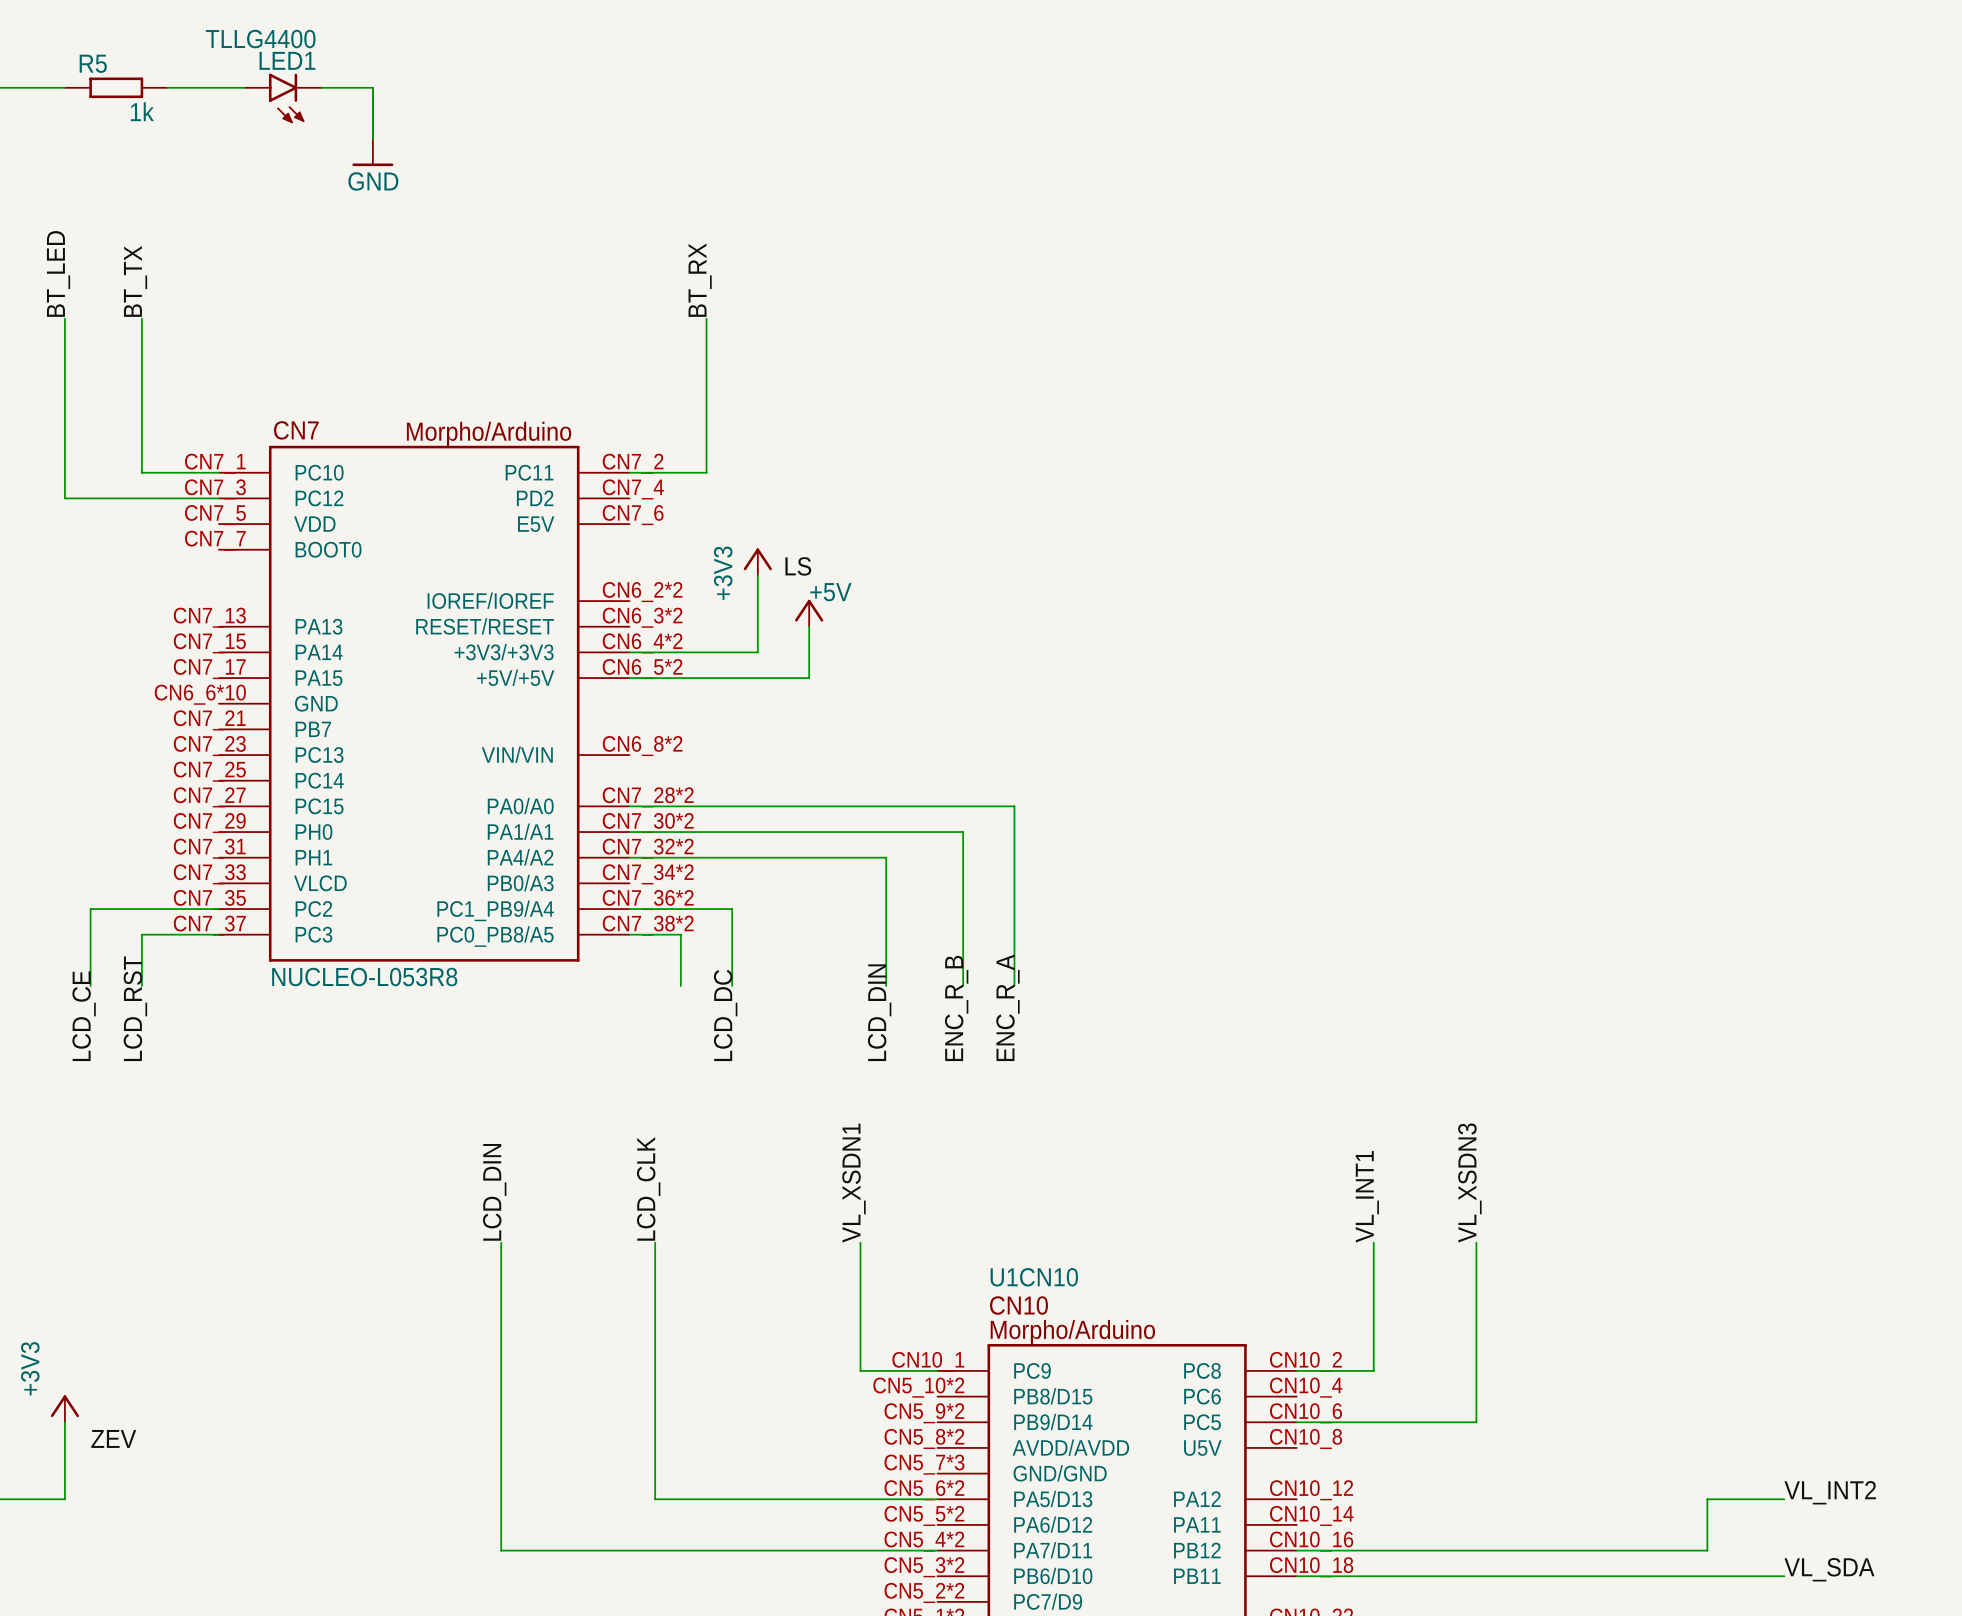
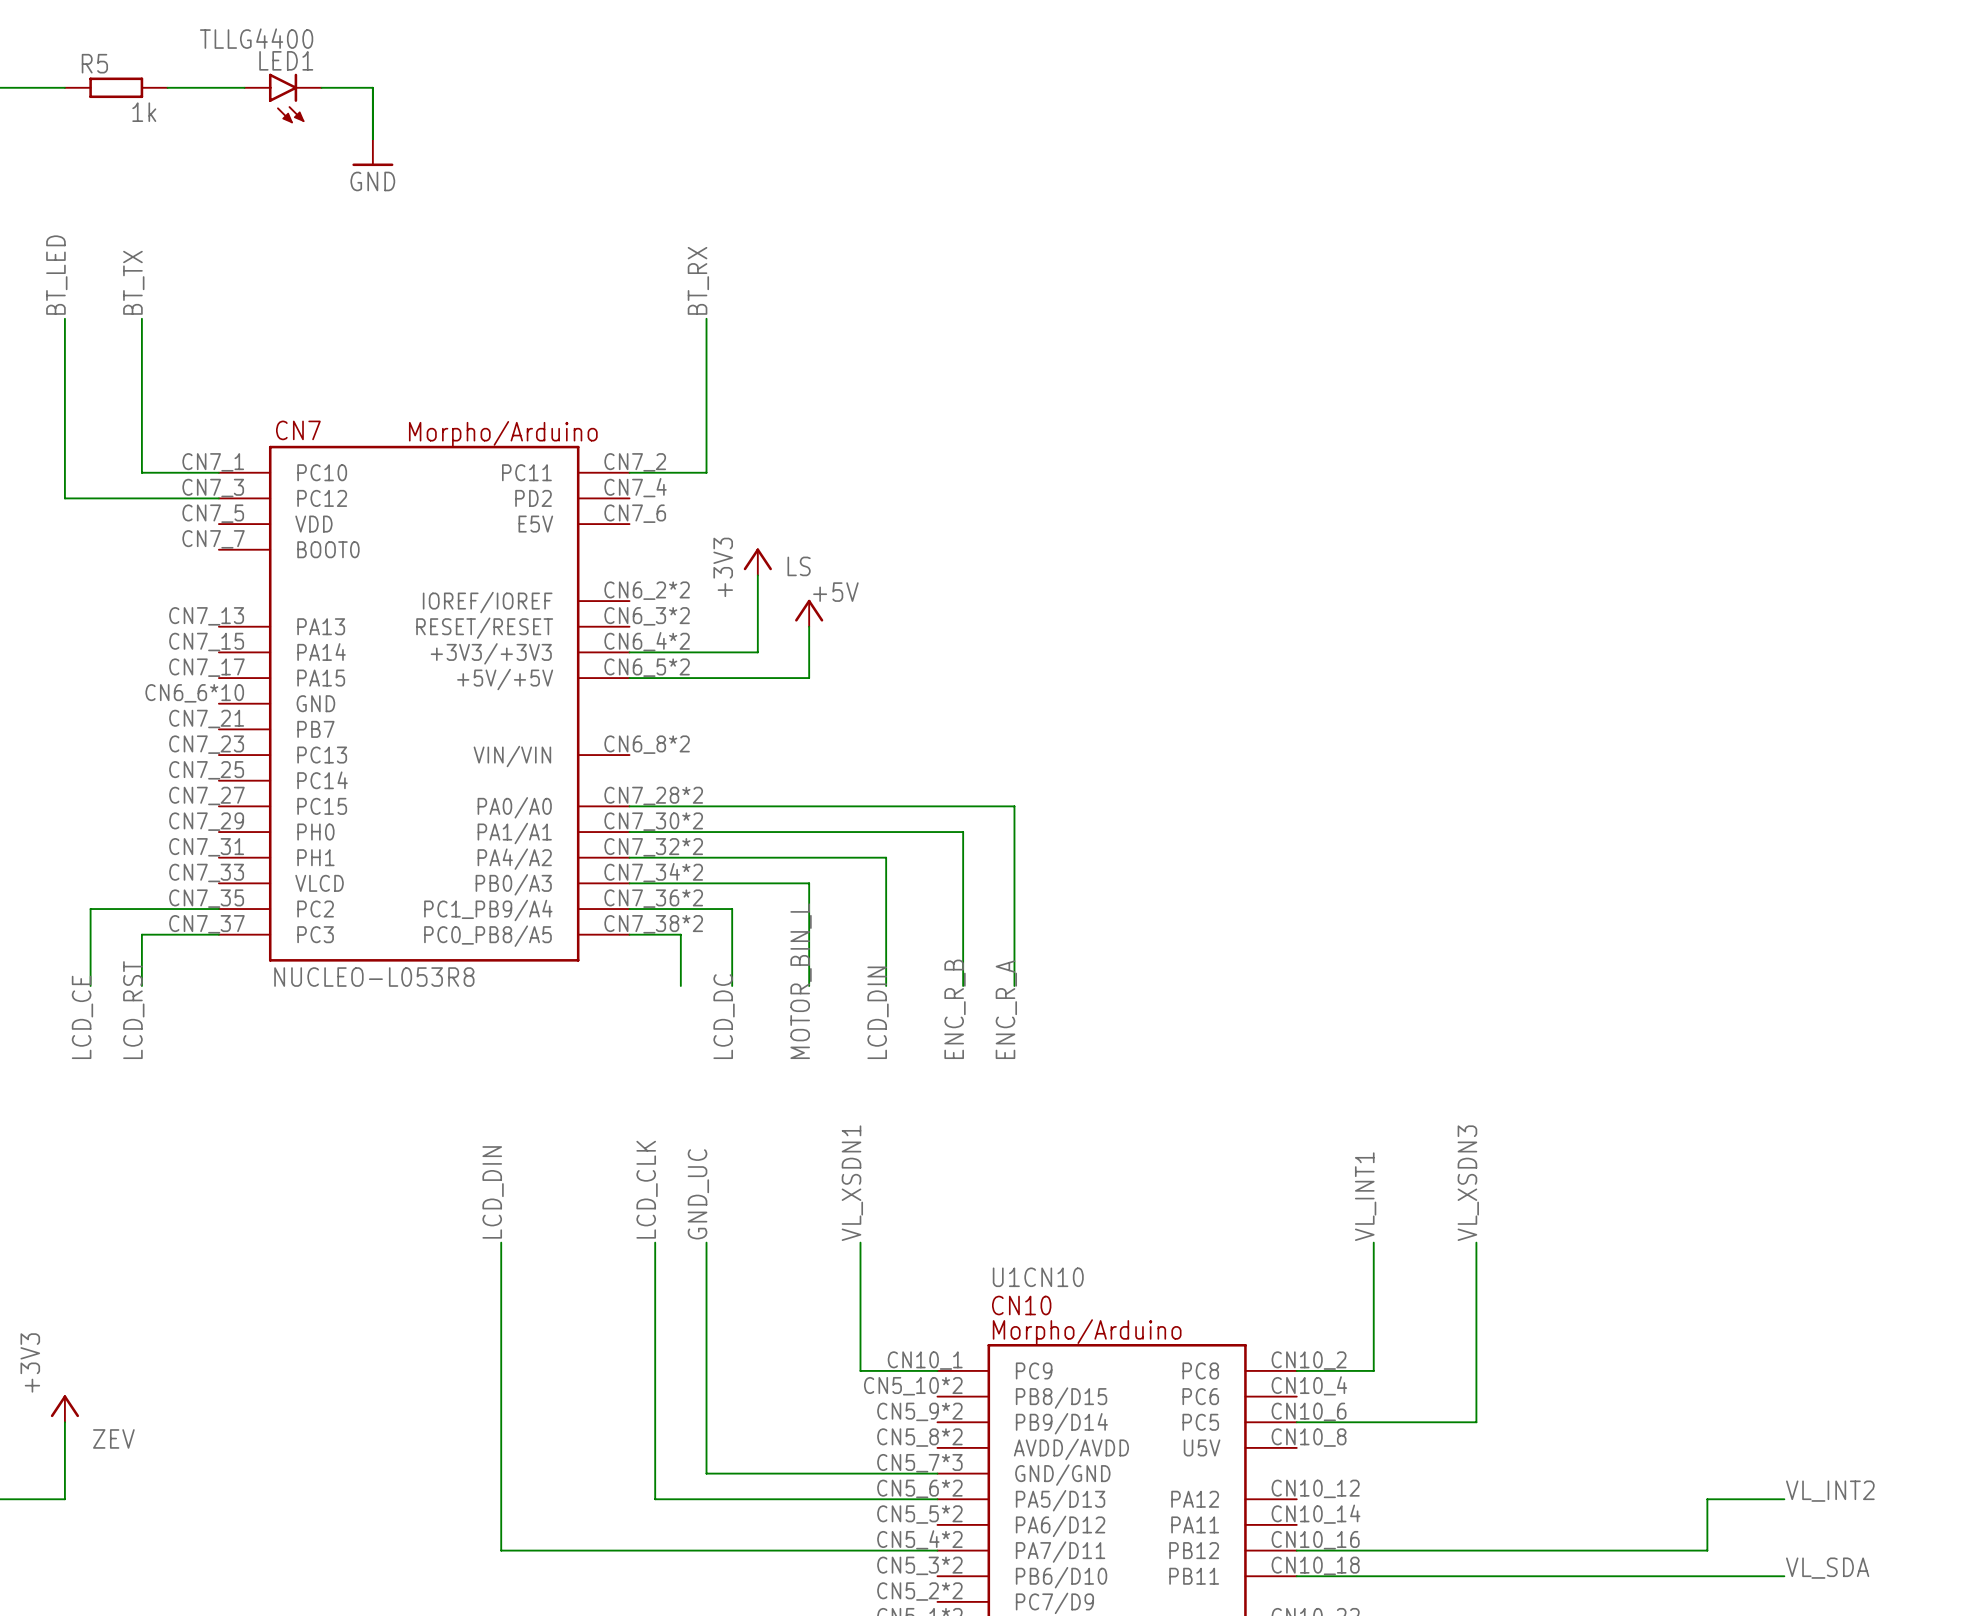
wire: none -> (629, 883) (809, 883) (809, 986)
label: none -> MOTOR_BIN_L (801, 981)
label: none -> GND_UC (698, 1194)
wire: none -> (706, 1242) (706, 1473) (937, 1473)

